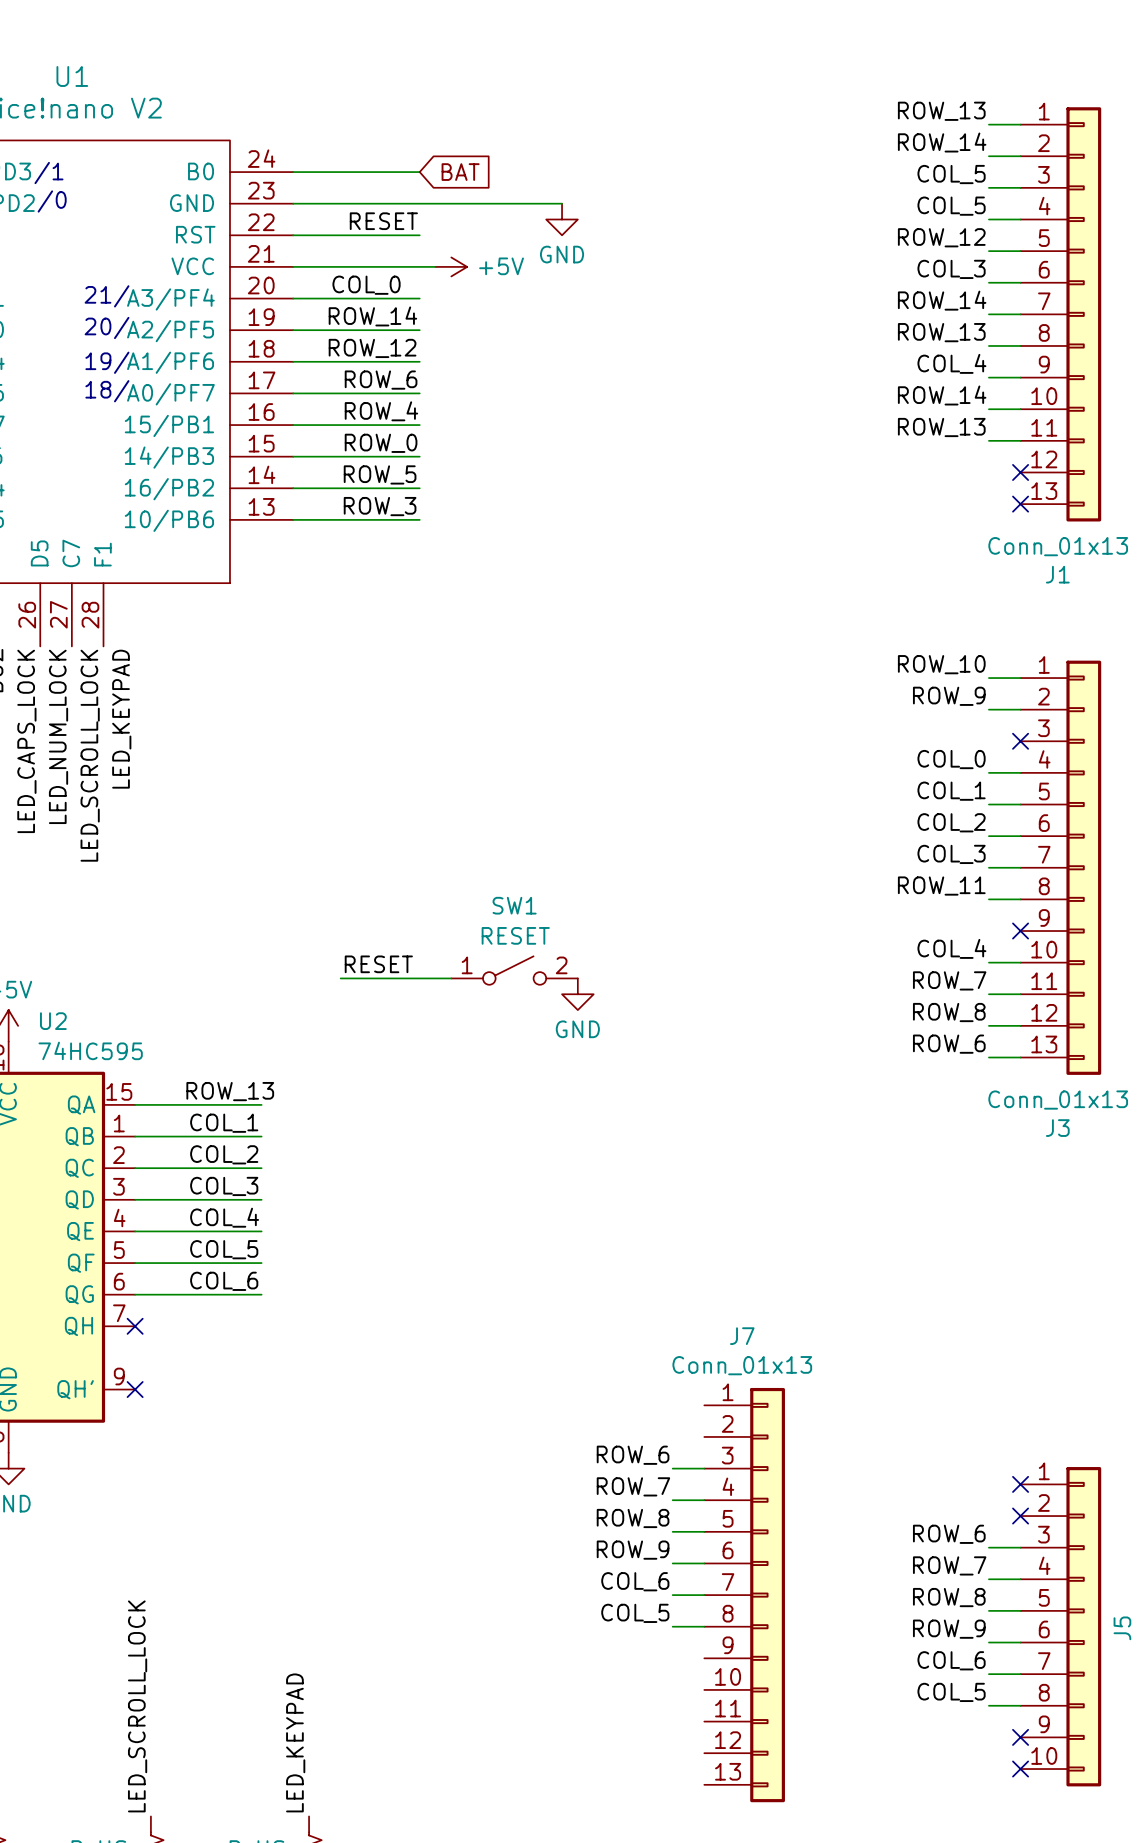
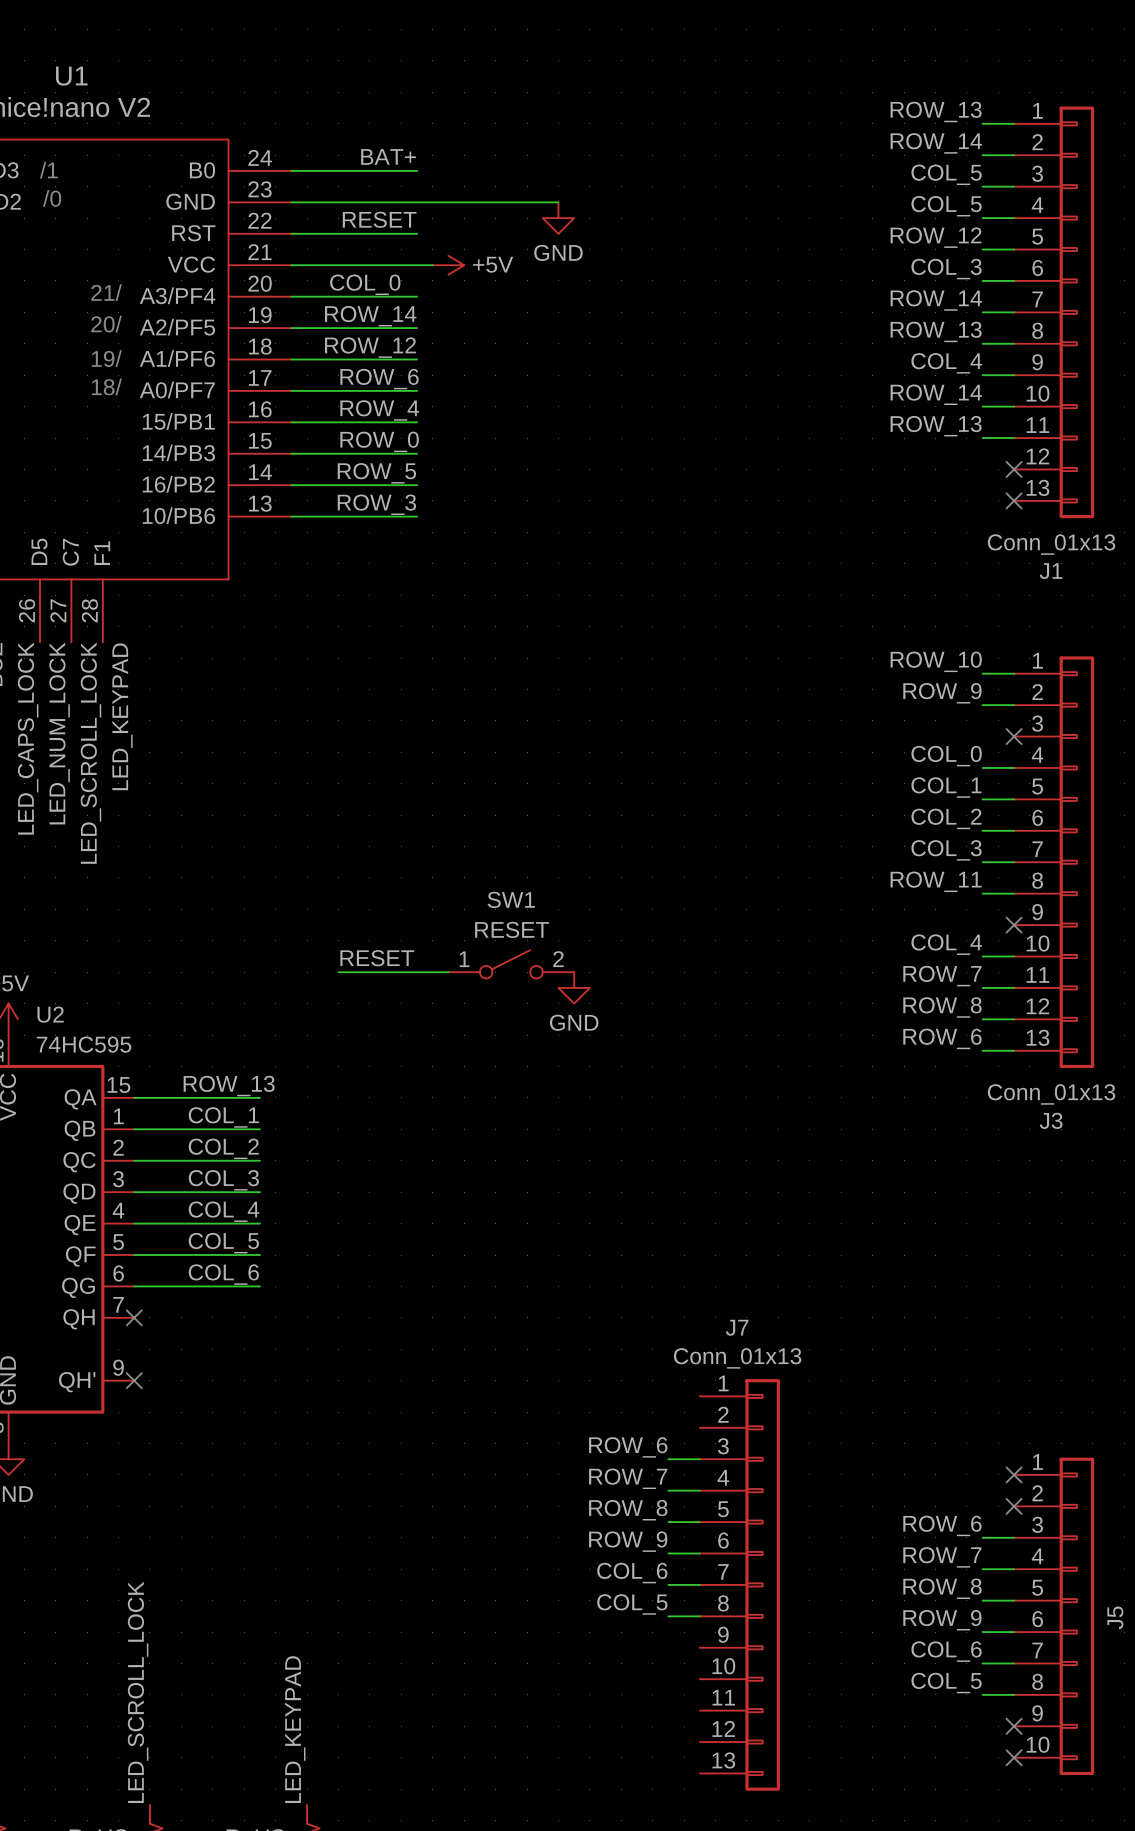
label: none -> BAT+ (388, 156)
global label: BAT (460, 172) -> none

